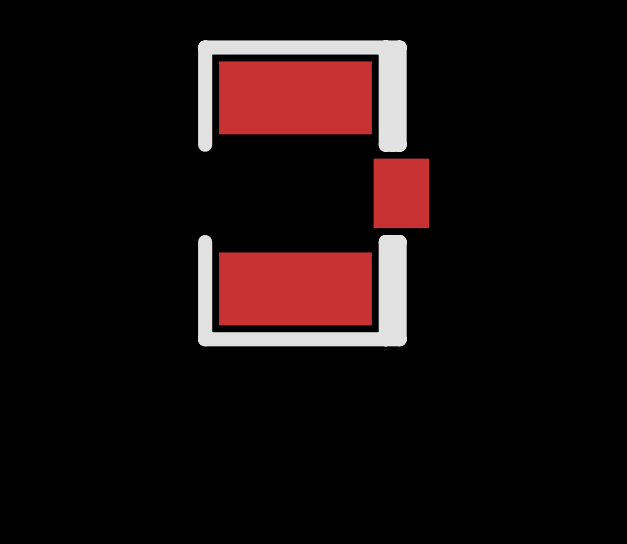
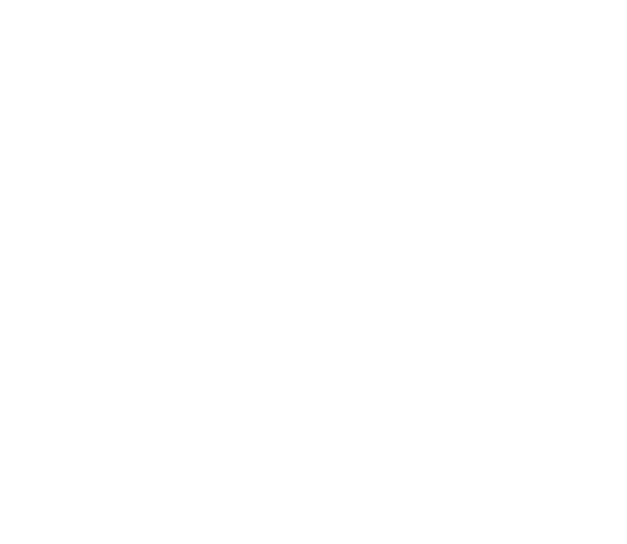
part: (313, 193) -> none

